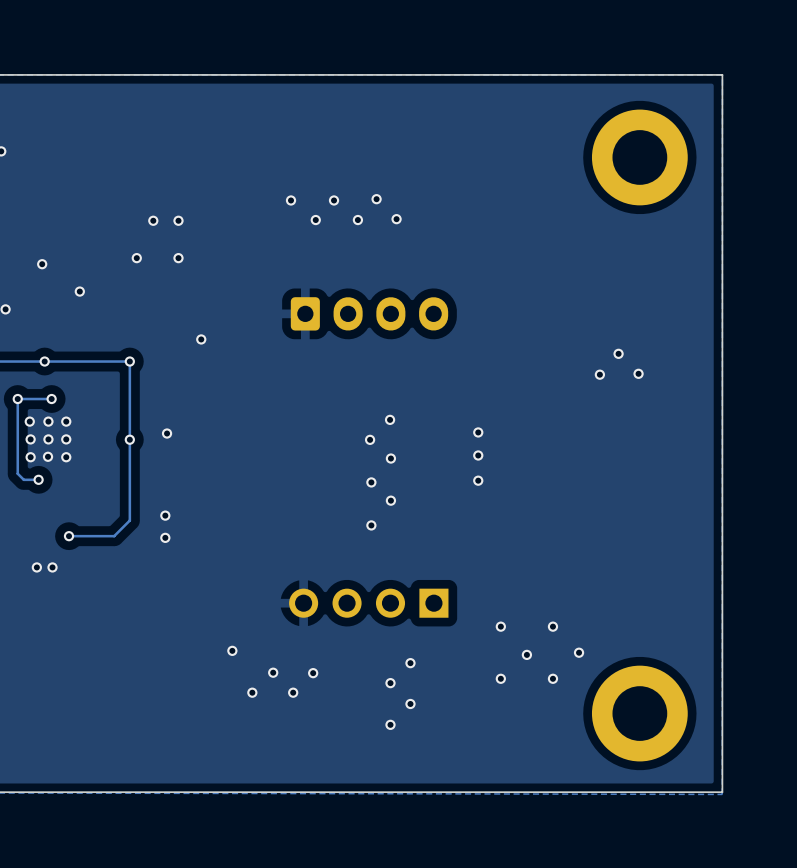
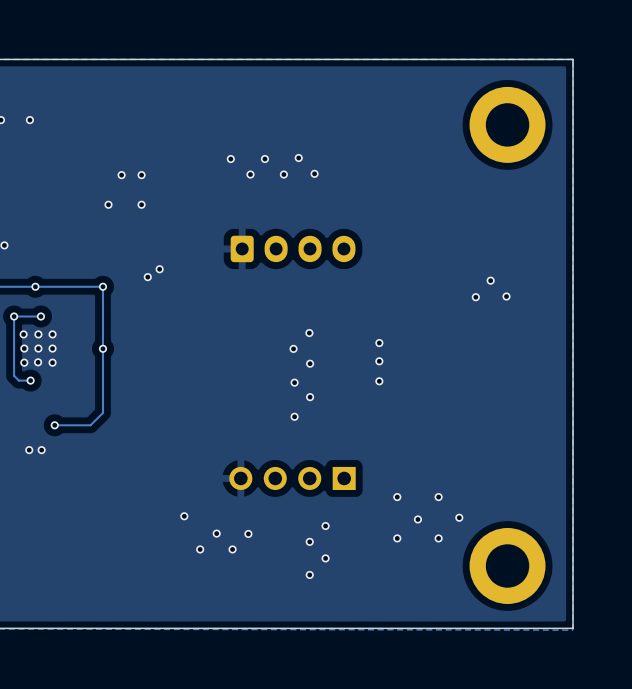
via: none -> (29, 120)
via: (42, 264) -> none
via: (79, 291) -> none
via: none -> (147, 277)
via: (167, 433) -> none
via: (165, 515) -> none
via: (165, 537) -> none

